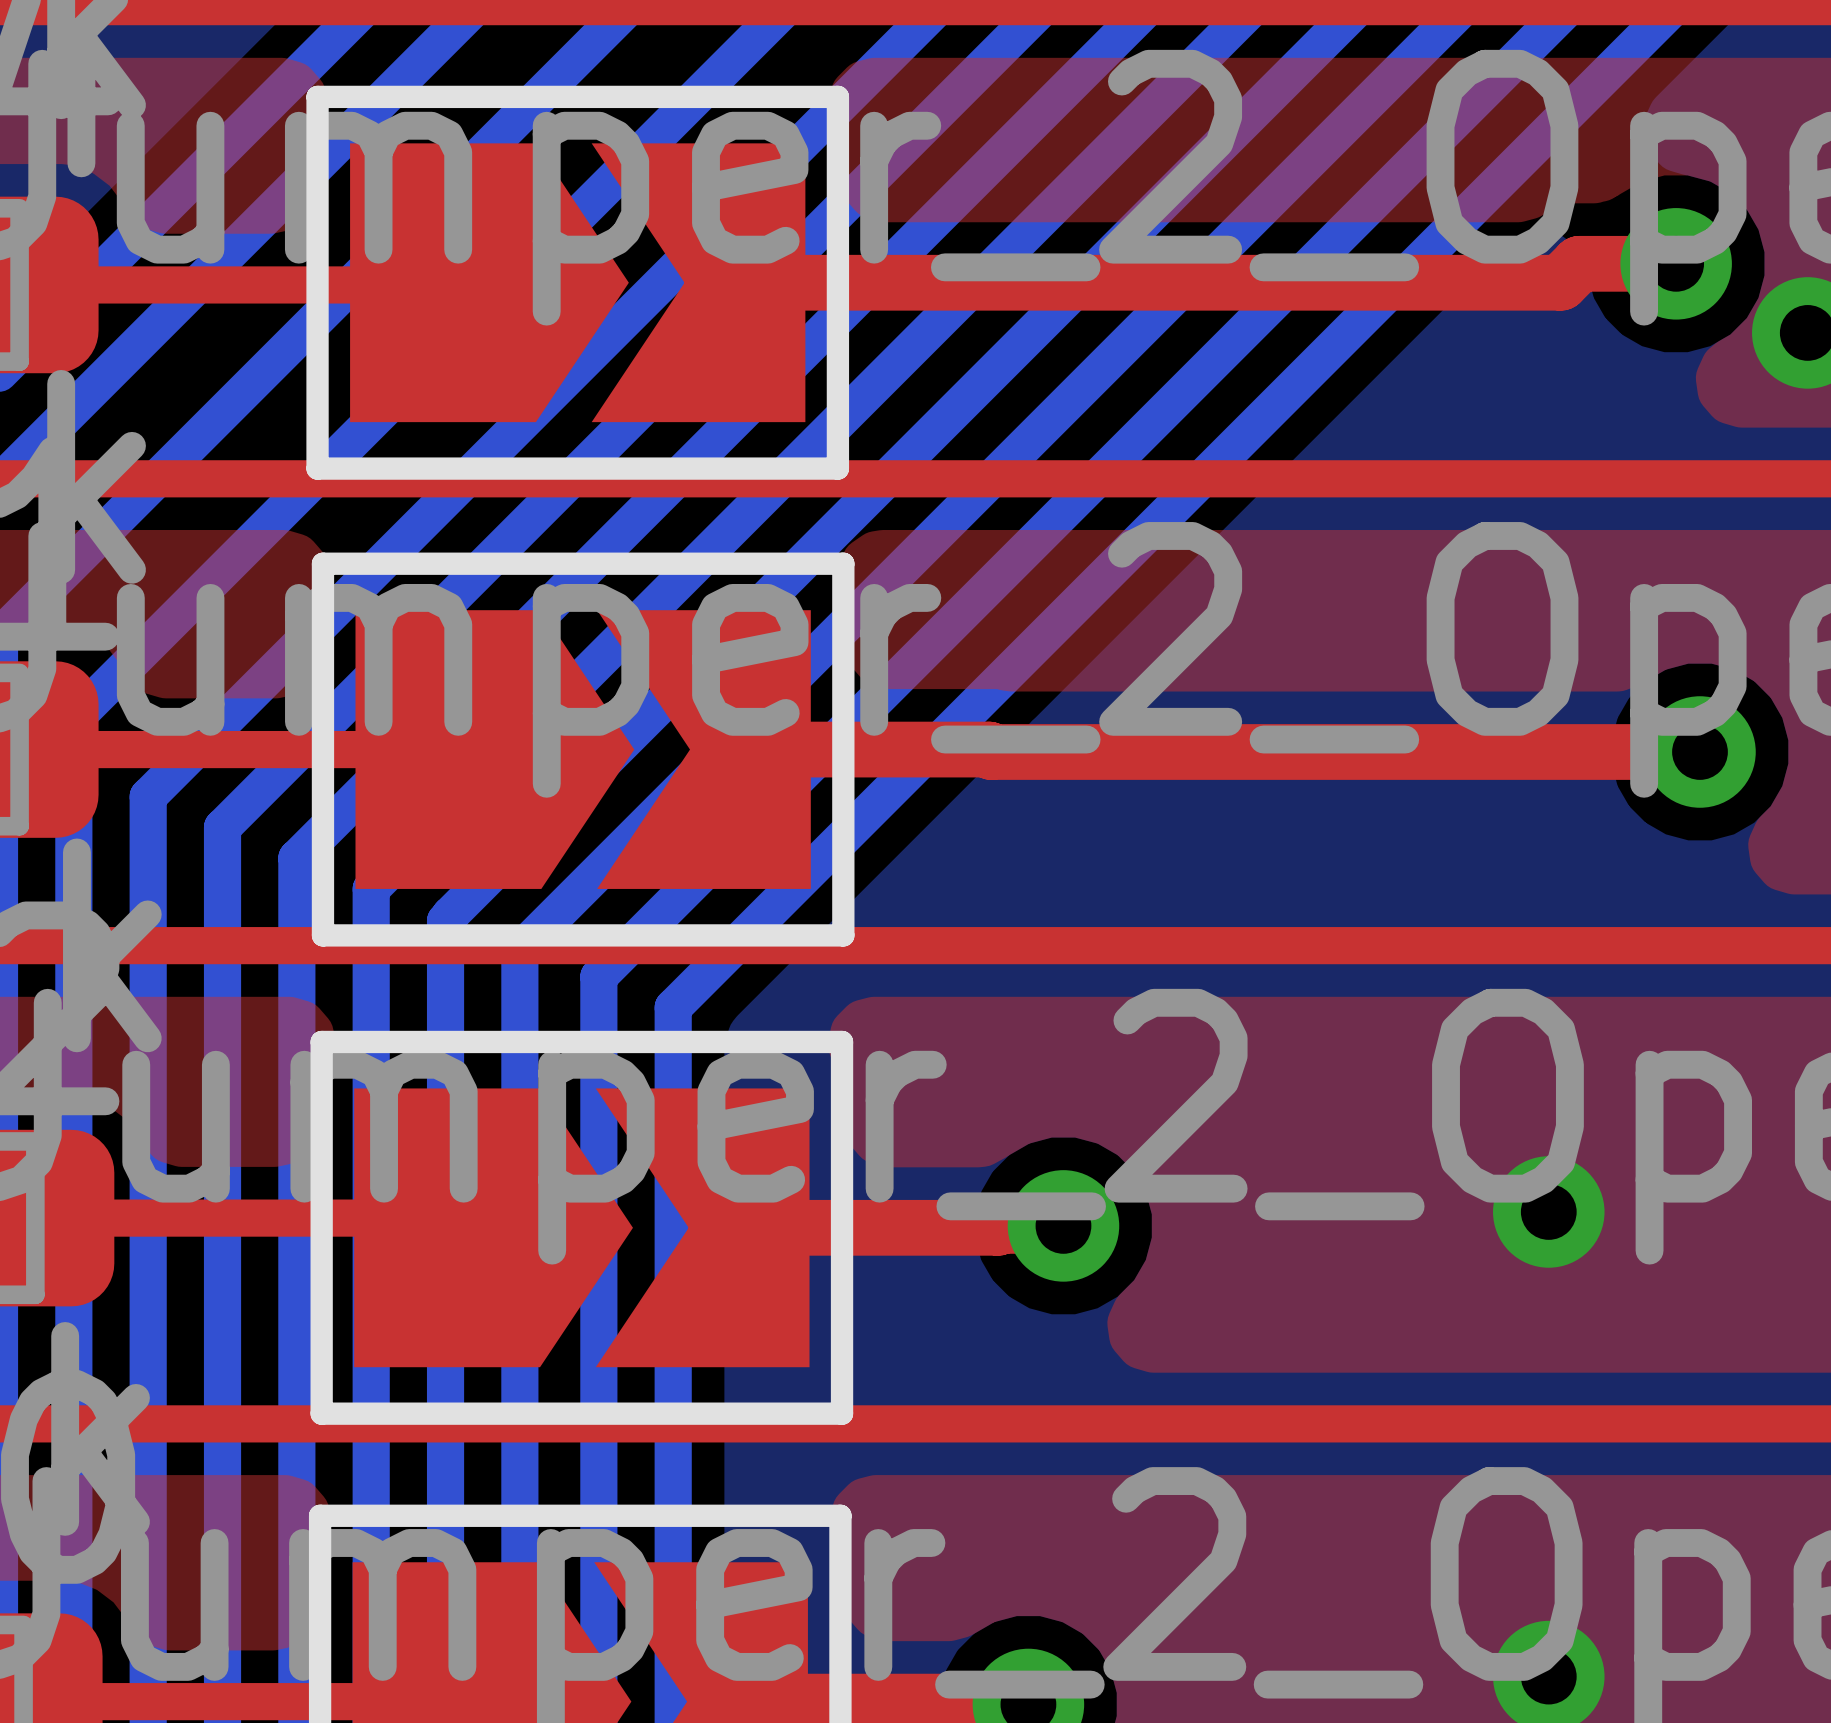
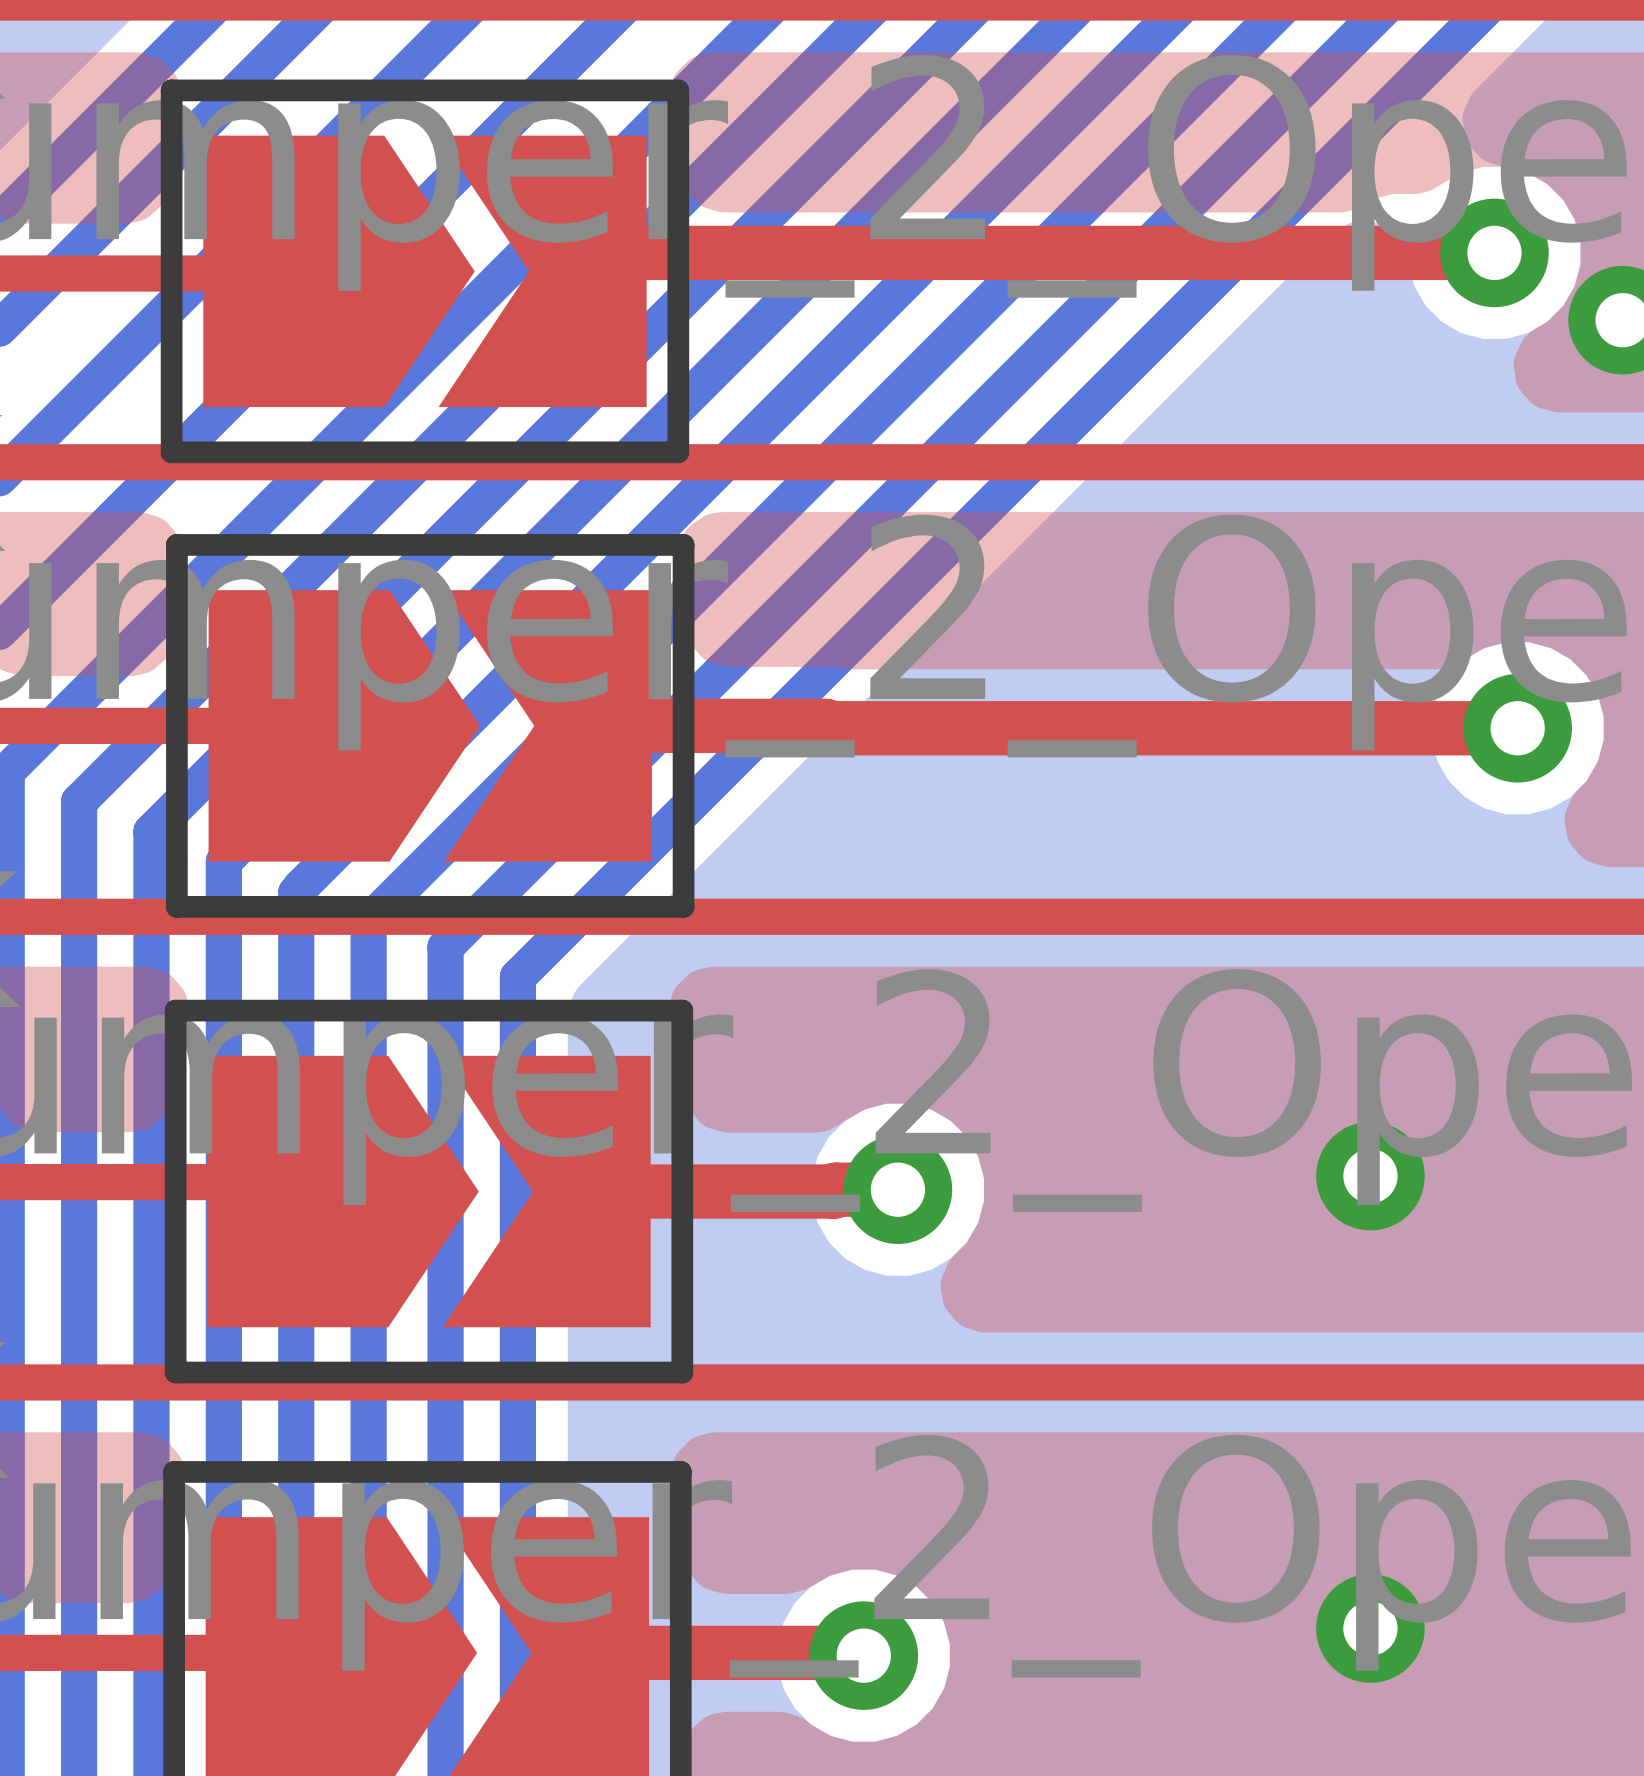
top track: (1579, 263) (1560, 282) (712, 282) -> (1400, 252) (574, 252) (556, 271)

